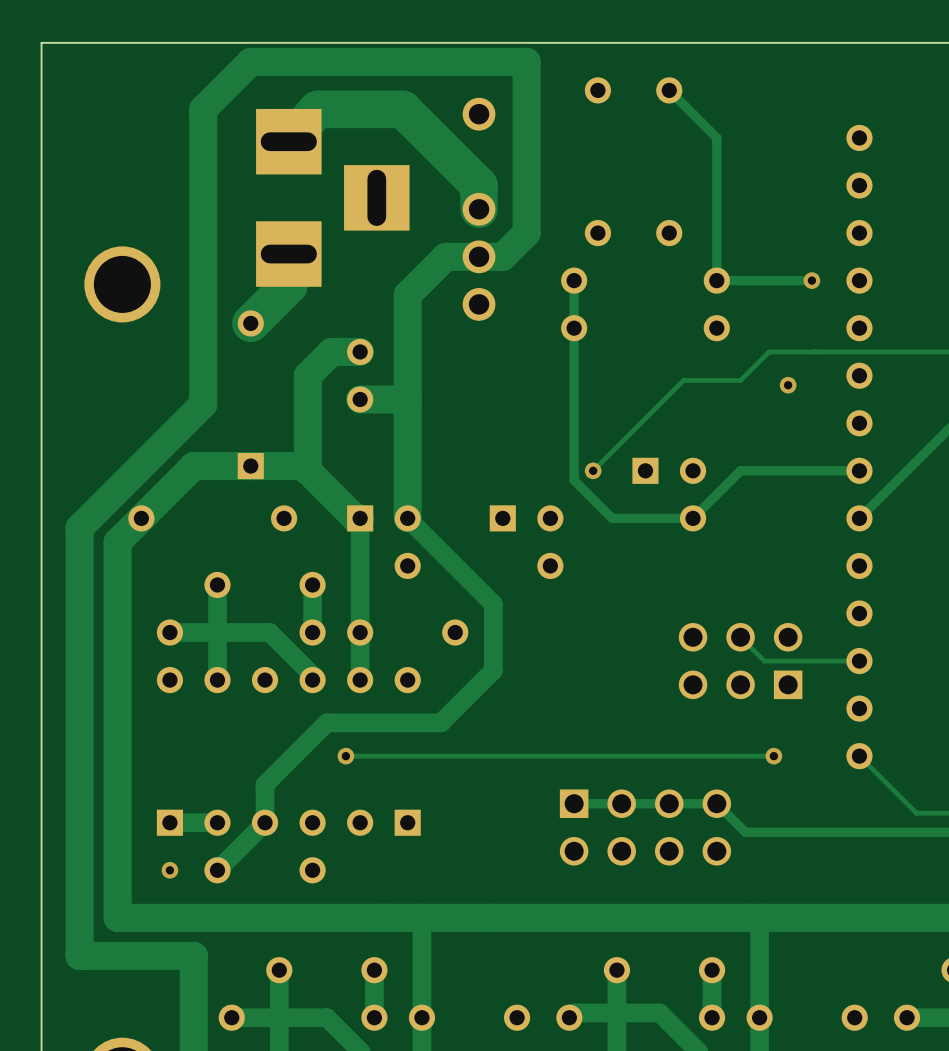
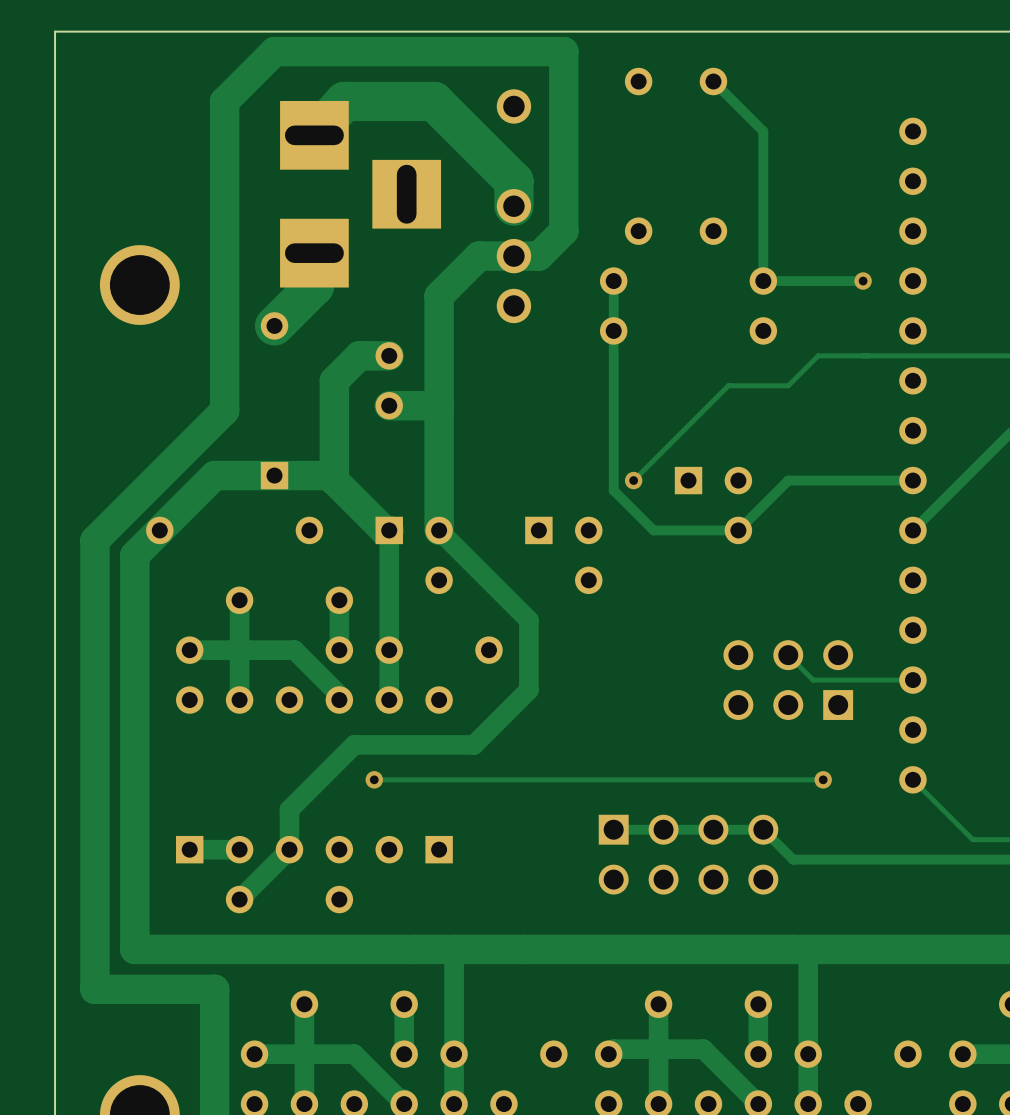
via: (788, 385) -> none
via: (169, 870) -> none

